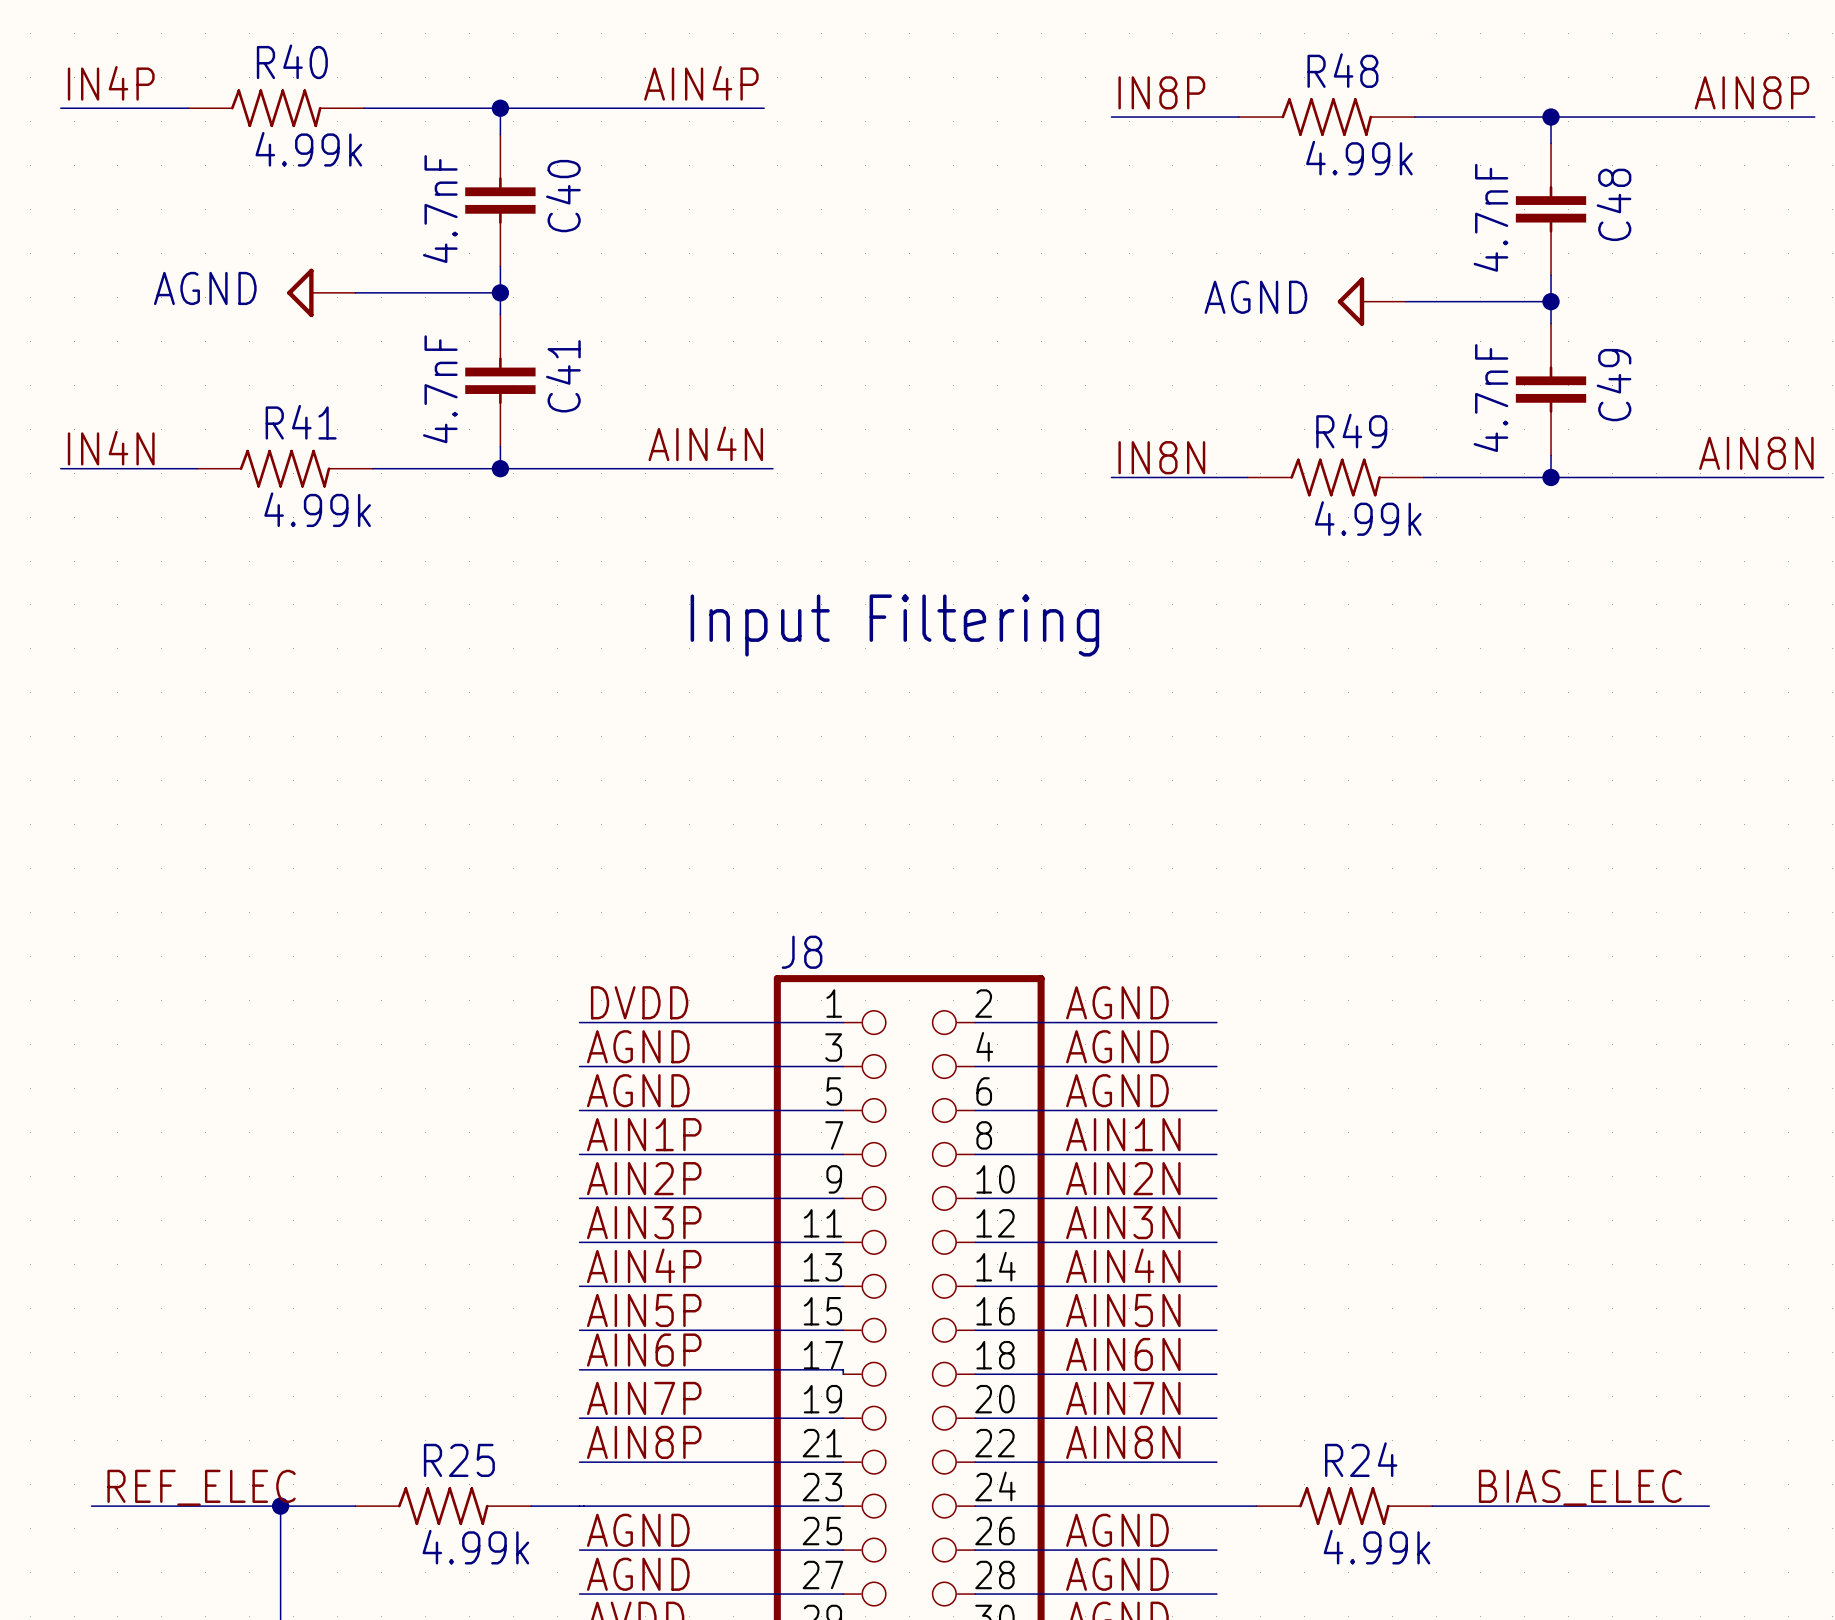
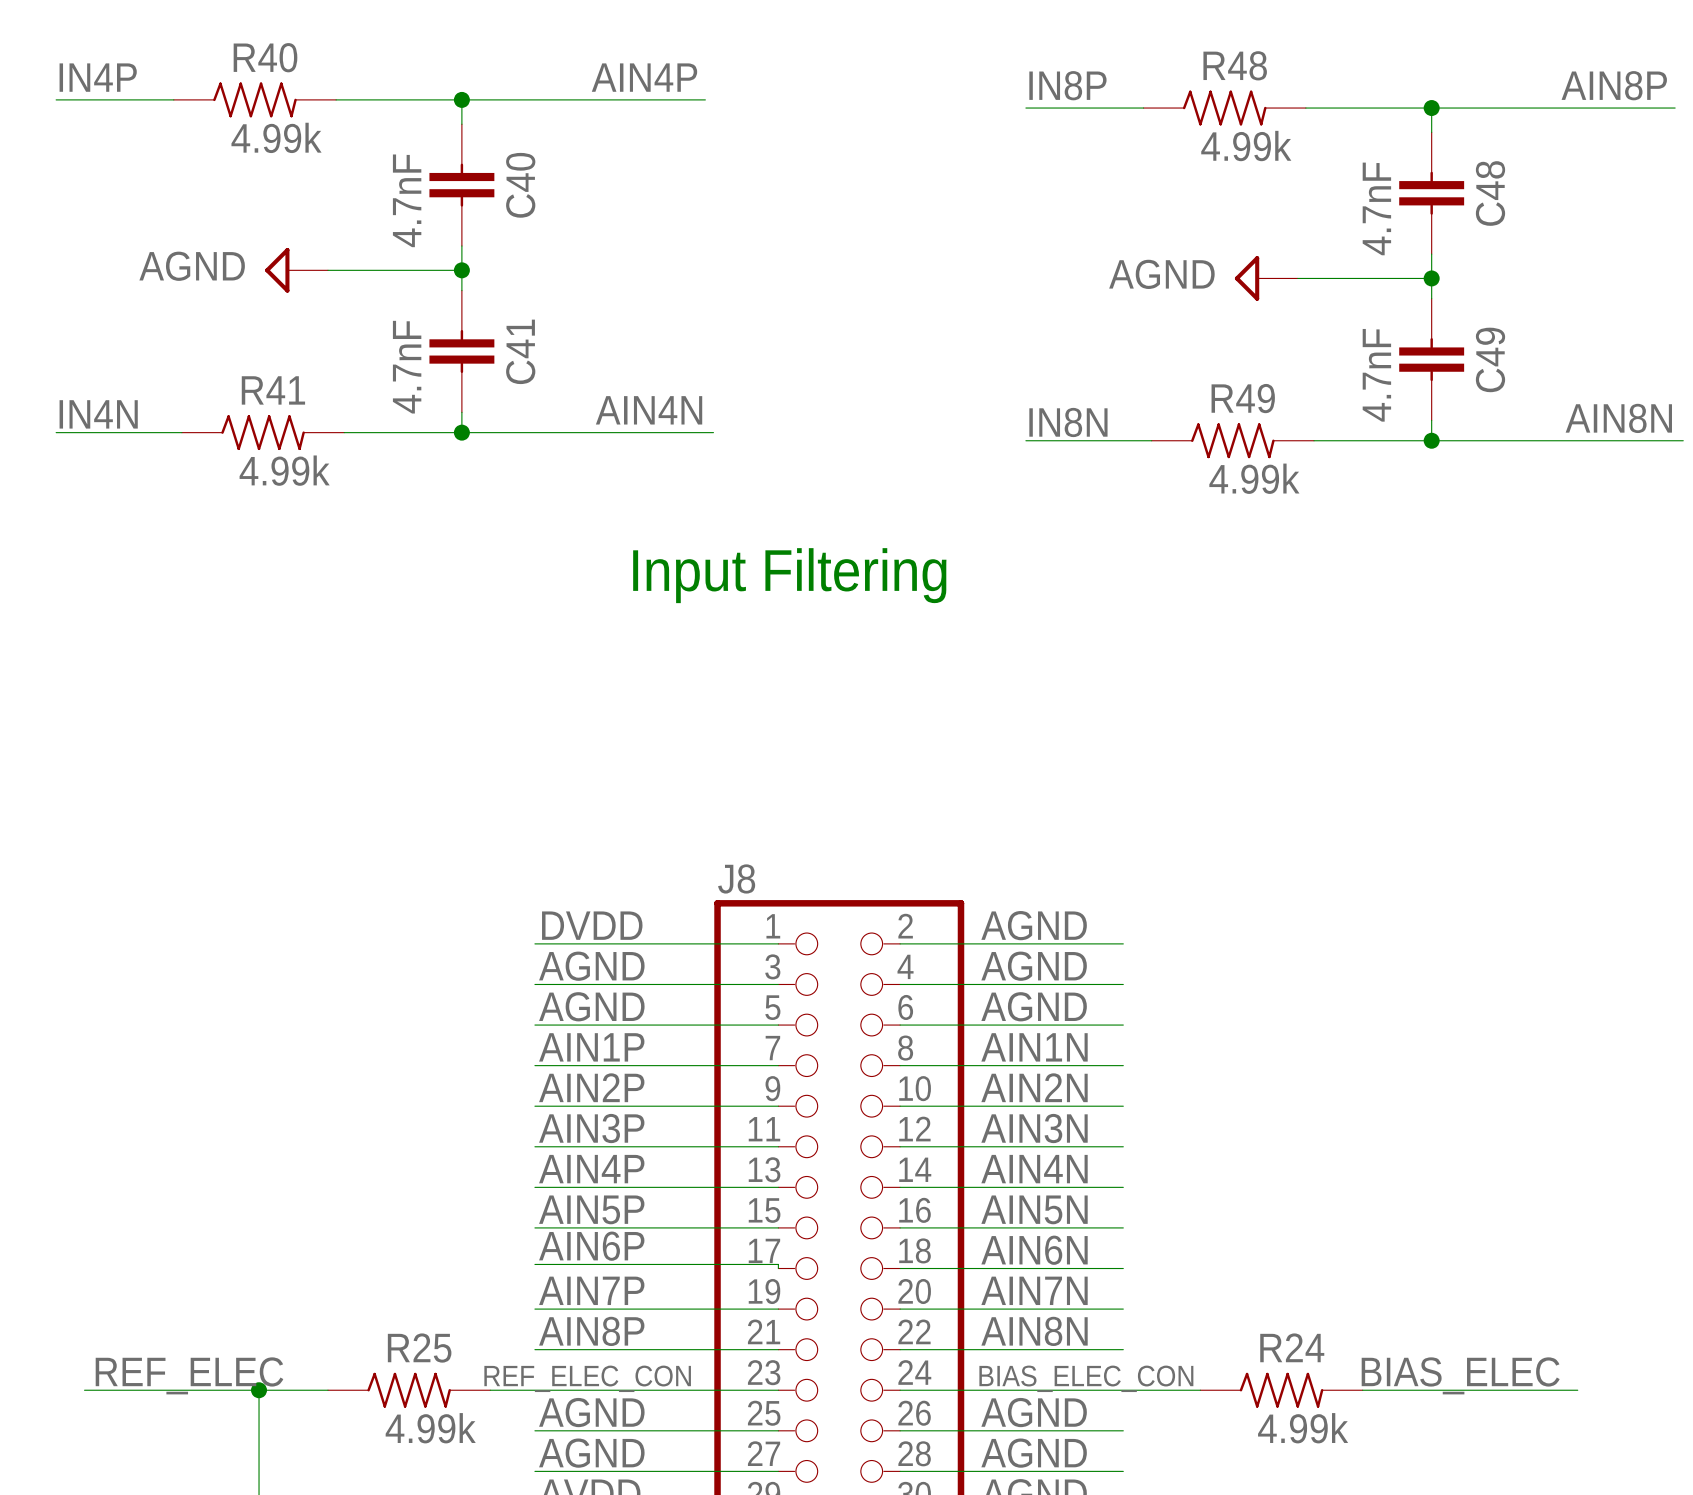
label: none -> REF_ELEC_CON (587, 1378)
label: none -> BIAS_ELEC_CON (1086, 1378)
R24 position: (1344, 1506) -> (1281, 1390)

